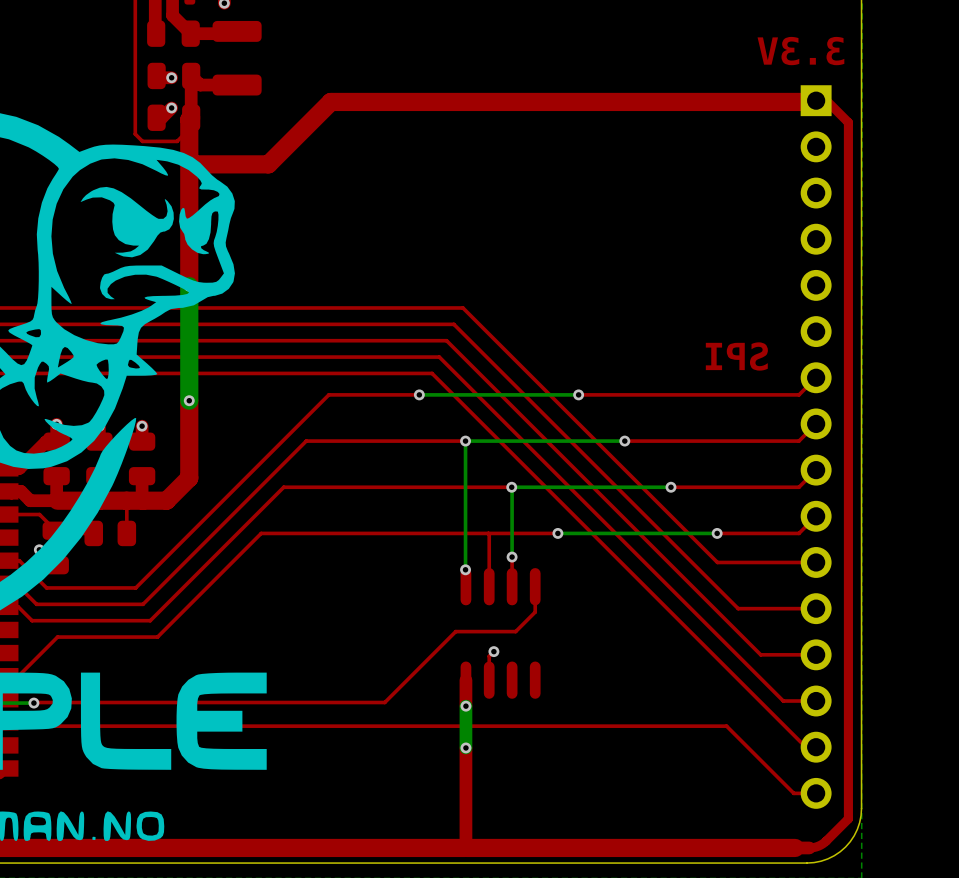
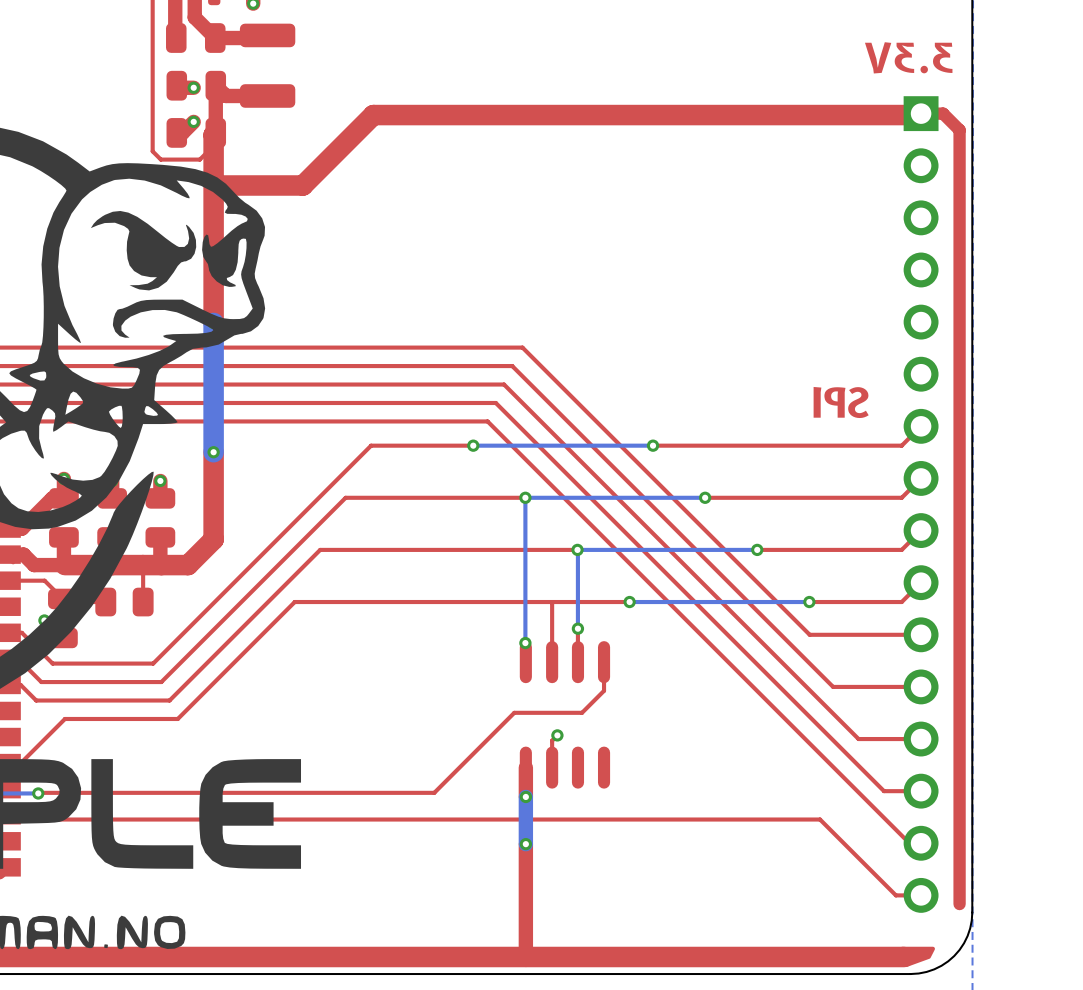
top track: (826, 100) (848, 122) (848, 818) (822, 843) (814, 847) (801, 847) -> (932, 113) (943, 113) (959, 130) (959, 904)
drawing: none -> [900, 946, 935, 968]

